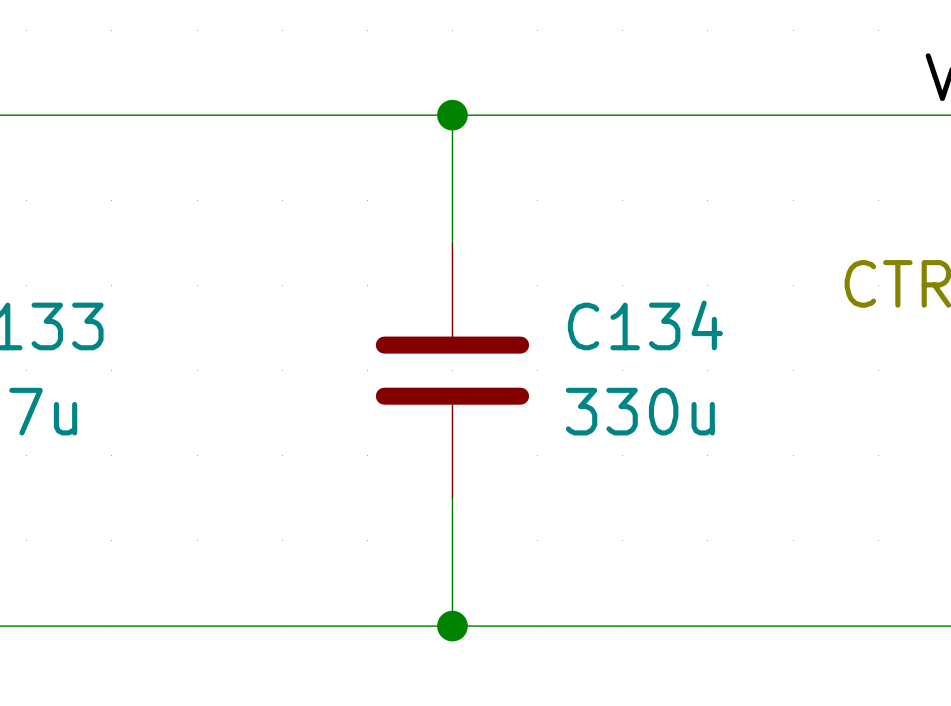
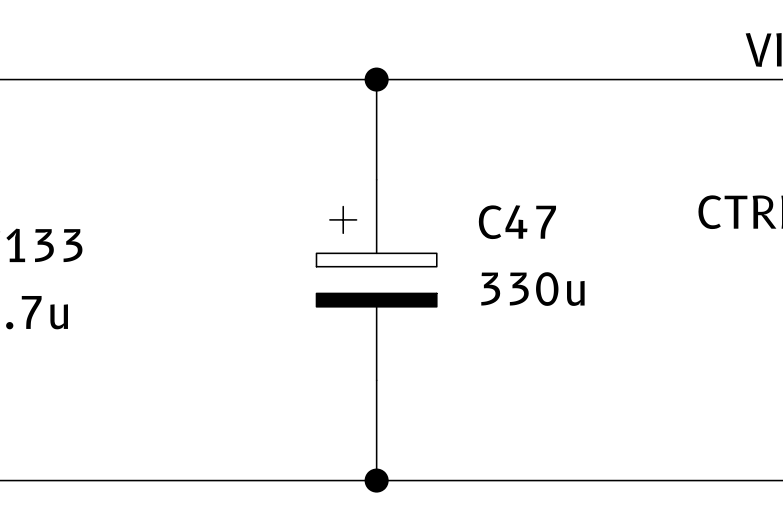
C134: 330u (452, 370) -> none
C47: none -> 330u (376, 280)

